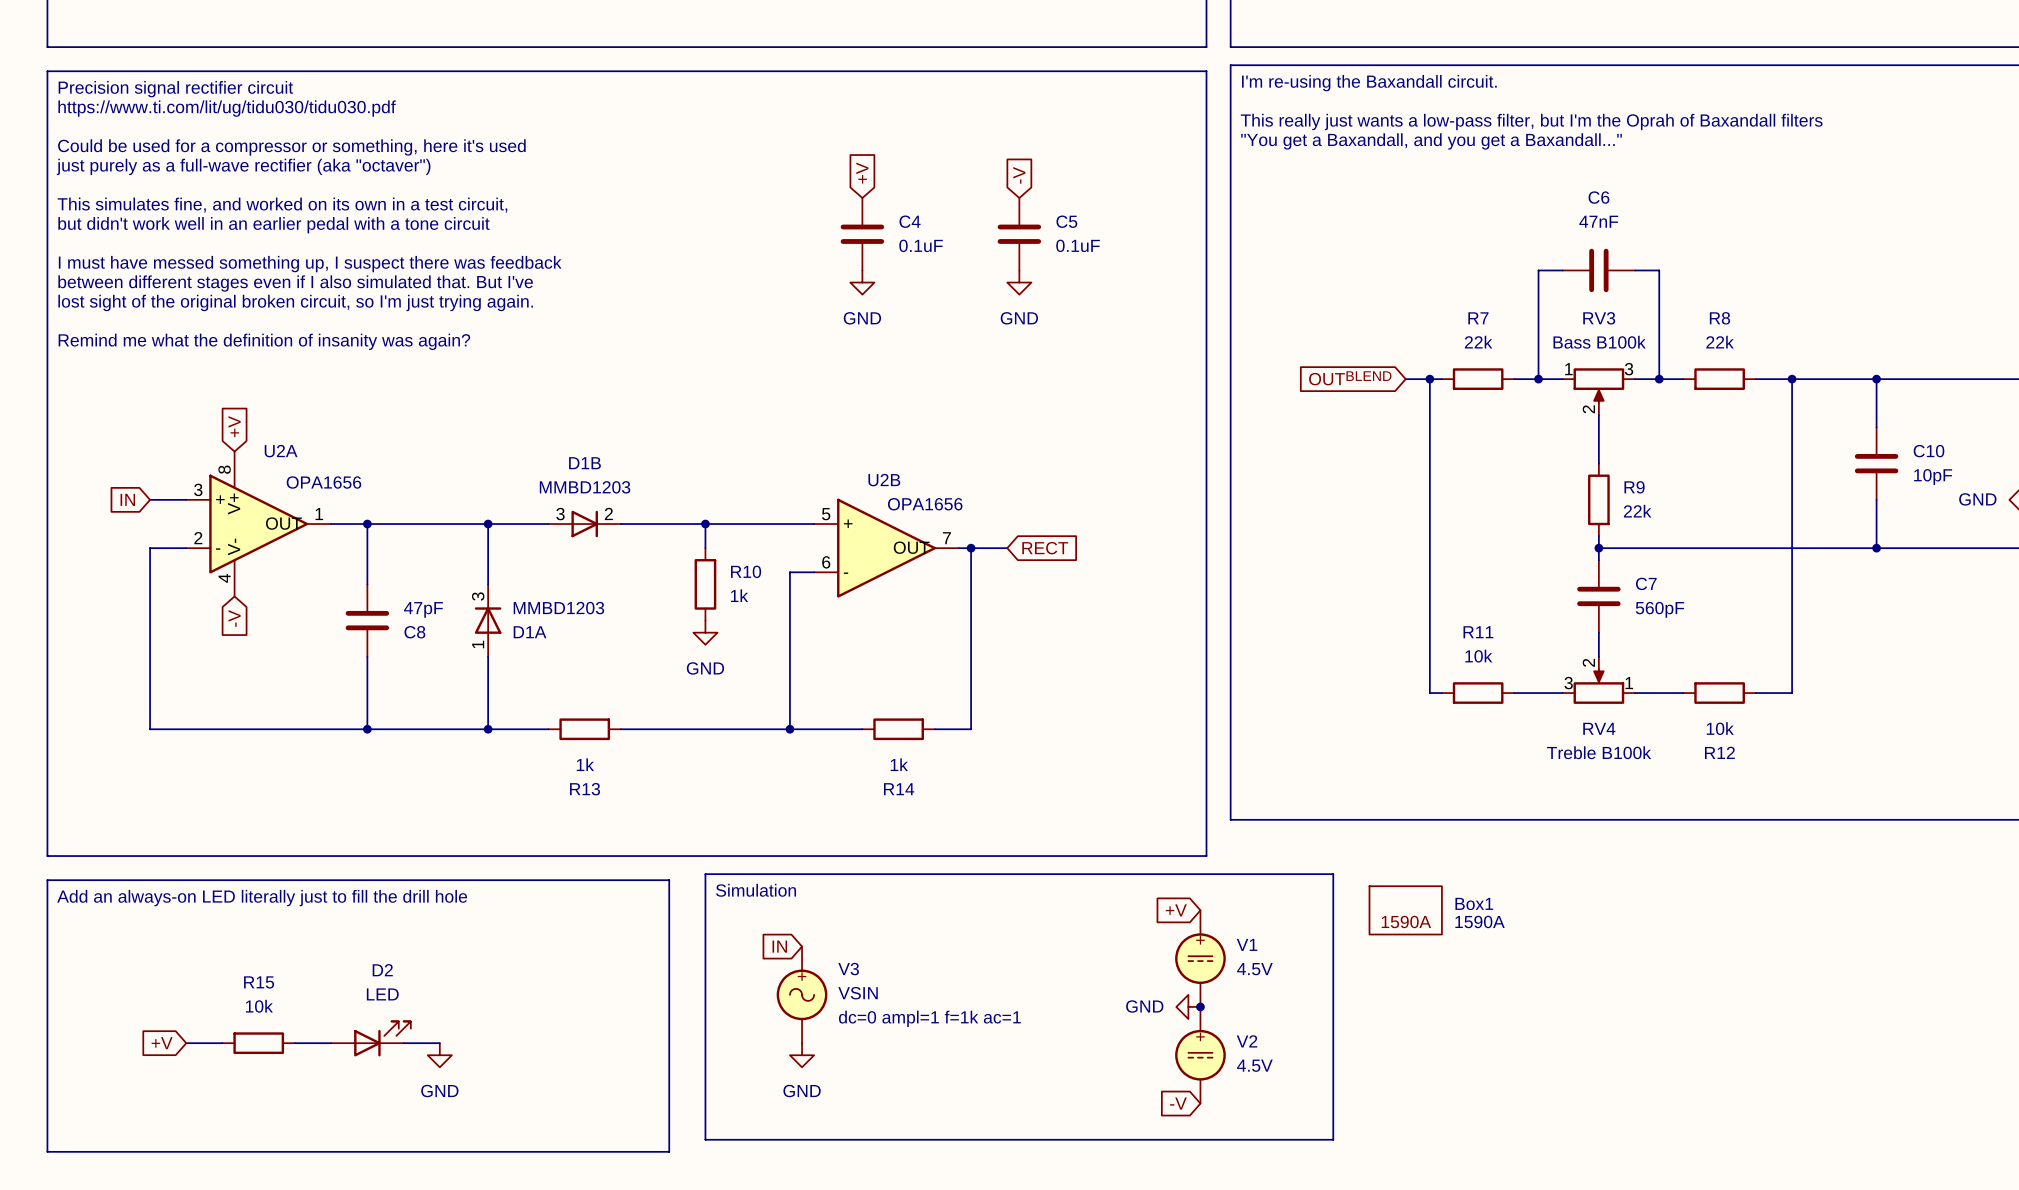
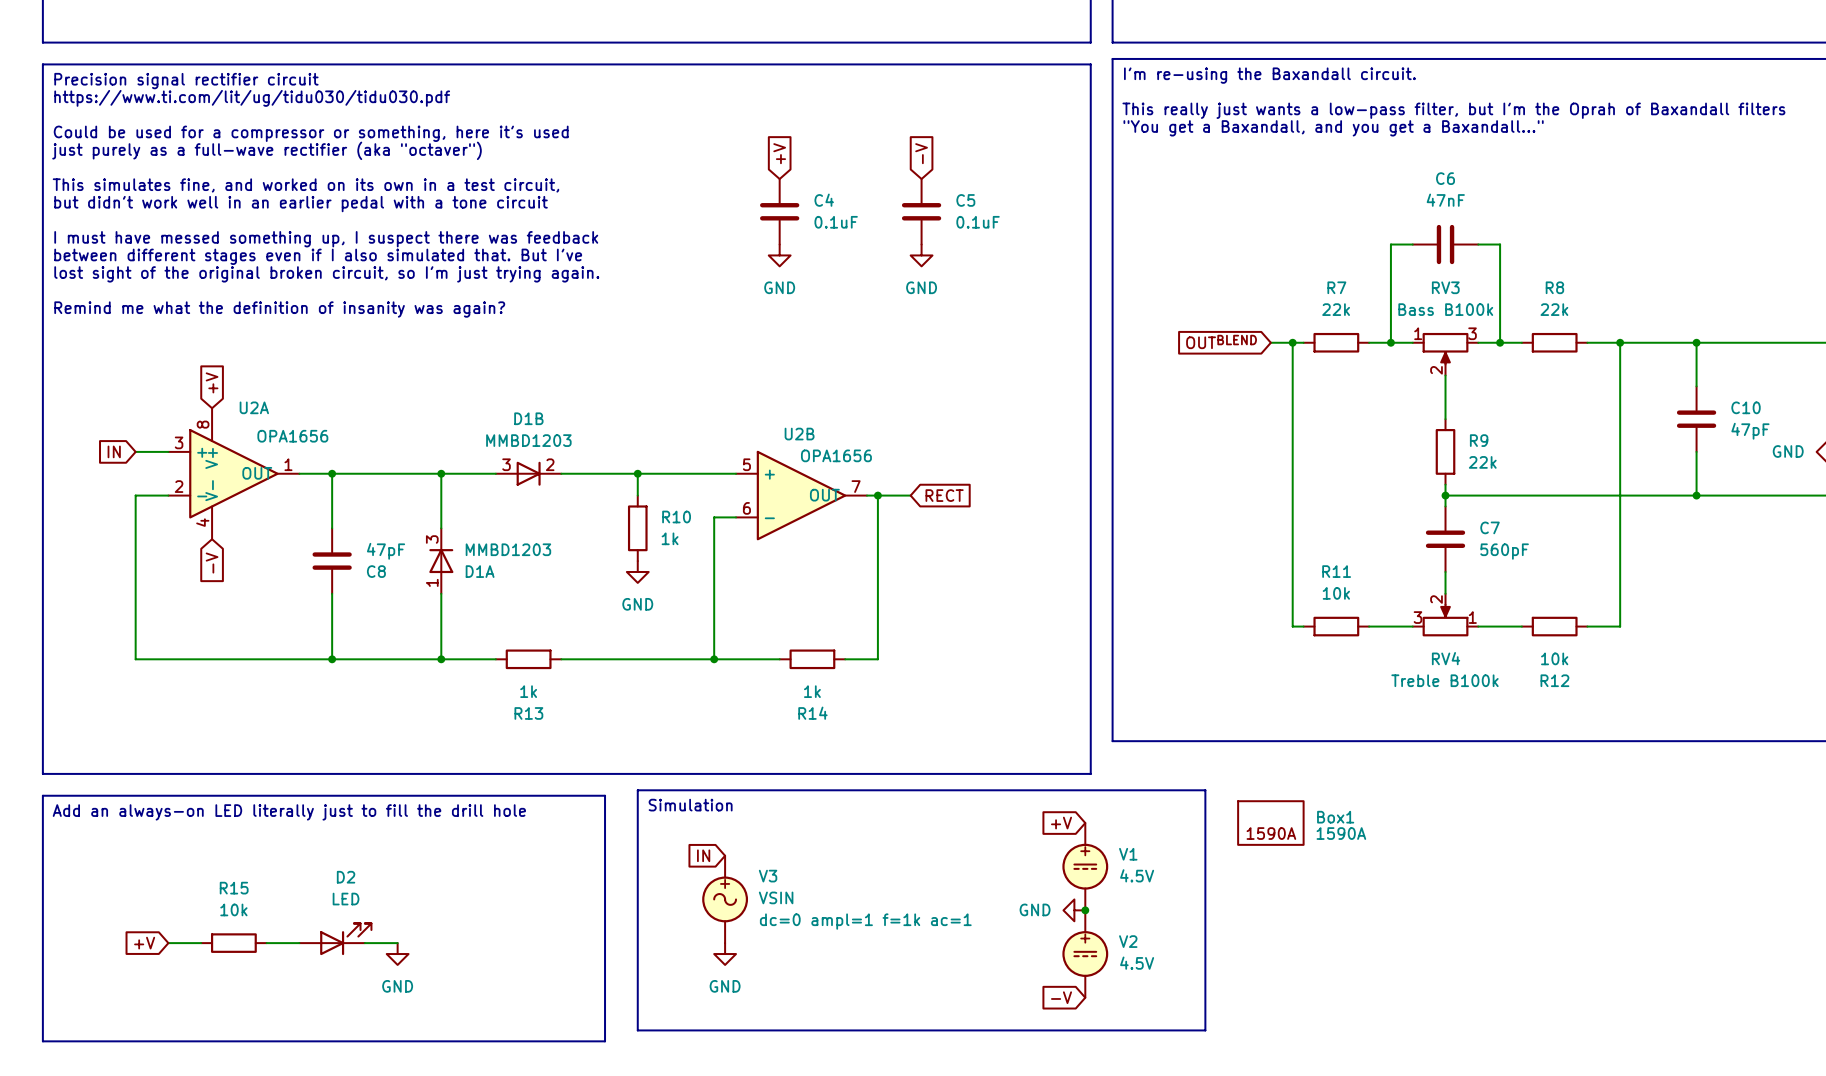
C10 value: 10pF (1933, 476) -> 47pF (1750, 431)

